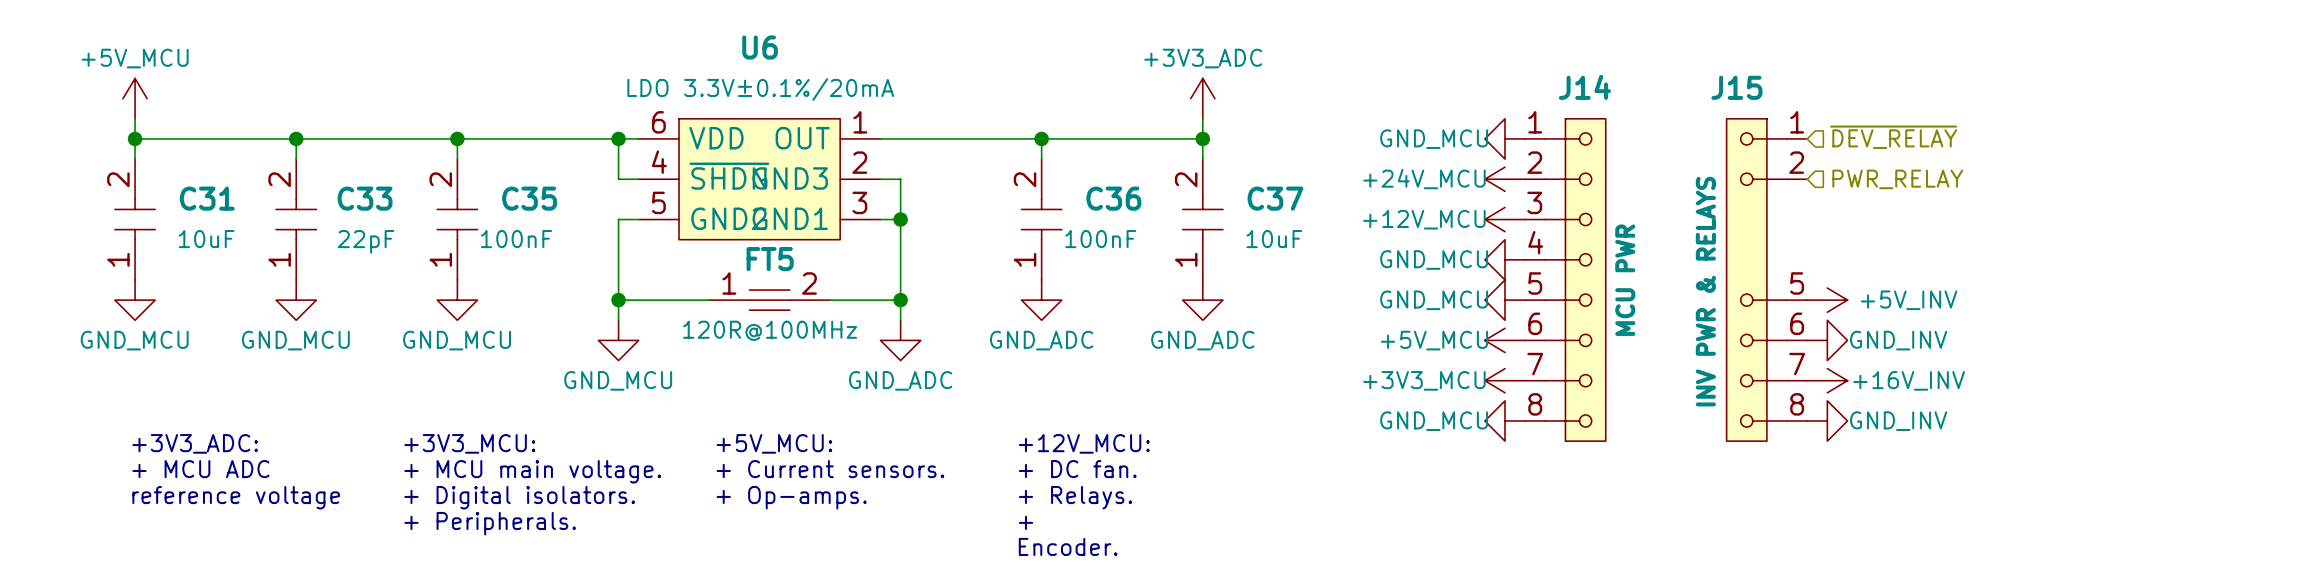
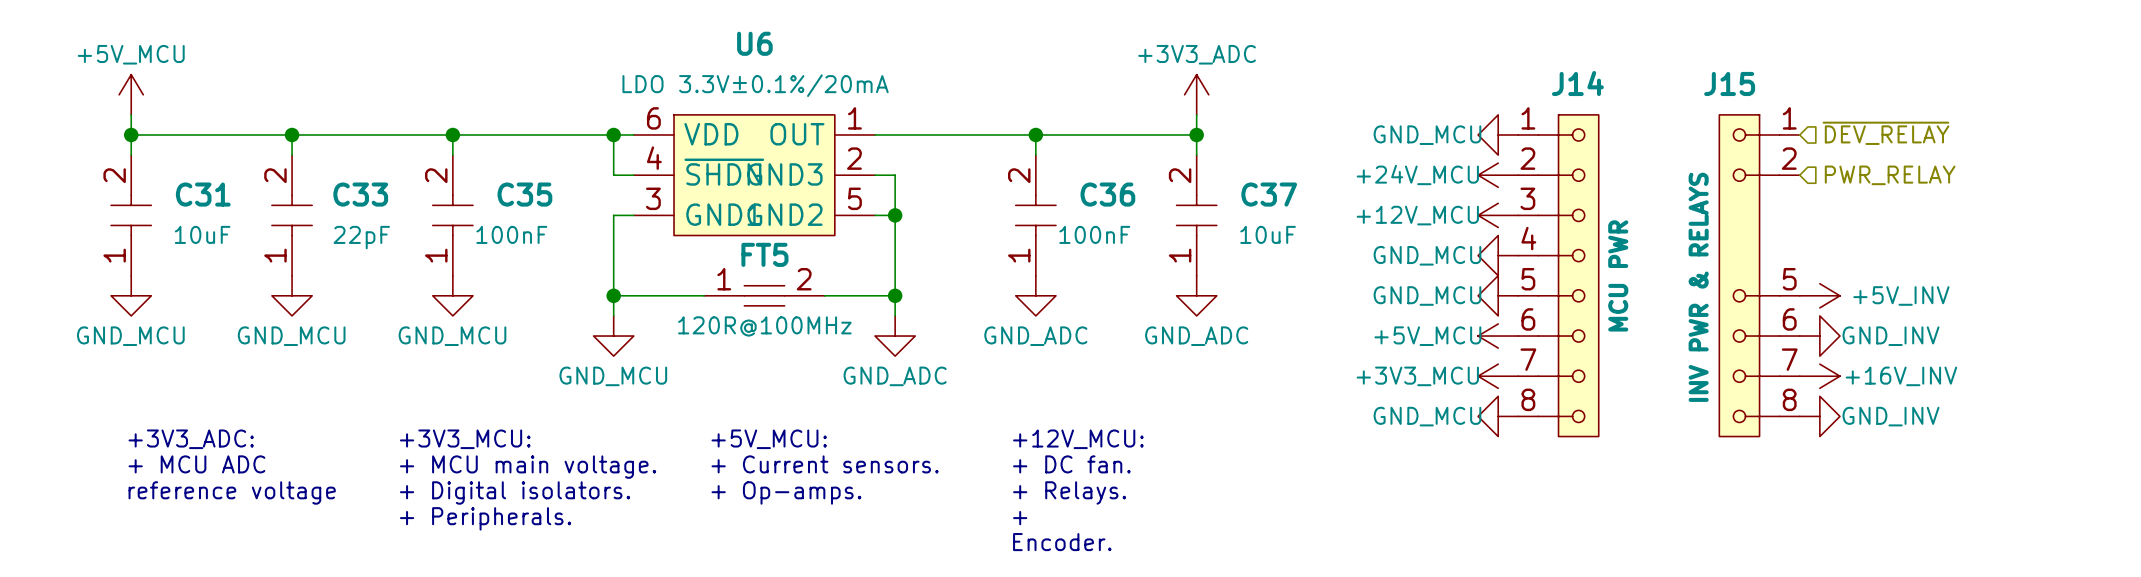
U6 pin number: 5 (658, 202) -> 3 (653, 198)
U6 pin number: 3 (859, 202) -> 5 (854, 198)
U6 pin name: GND2 (728, 218) -> GND1 (723, 214)
U6 pin name: GND1 (790, 218) -> GND2 (784, 214)

